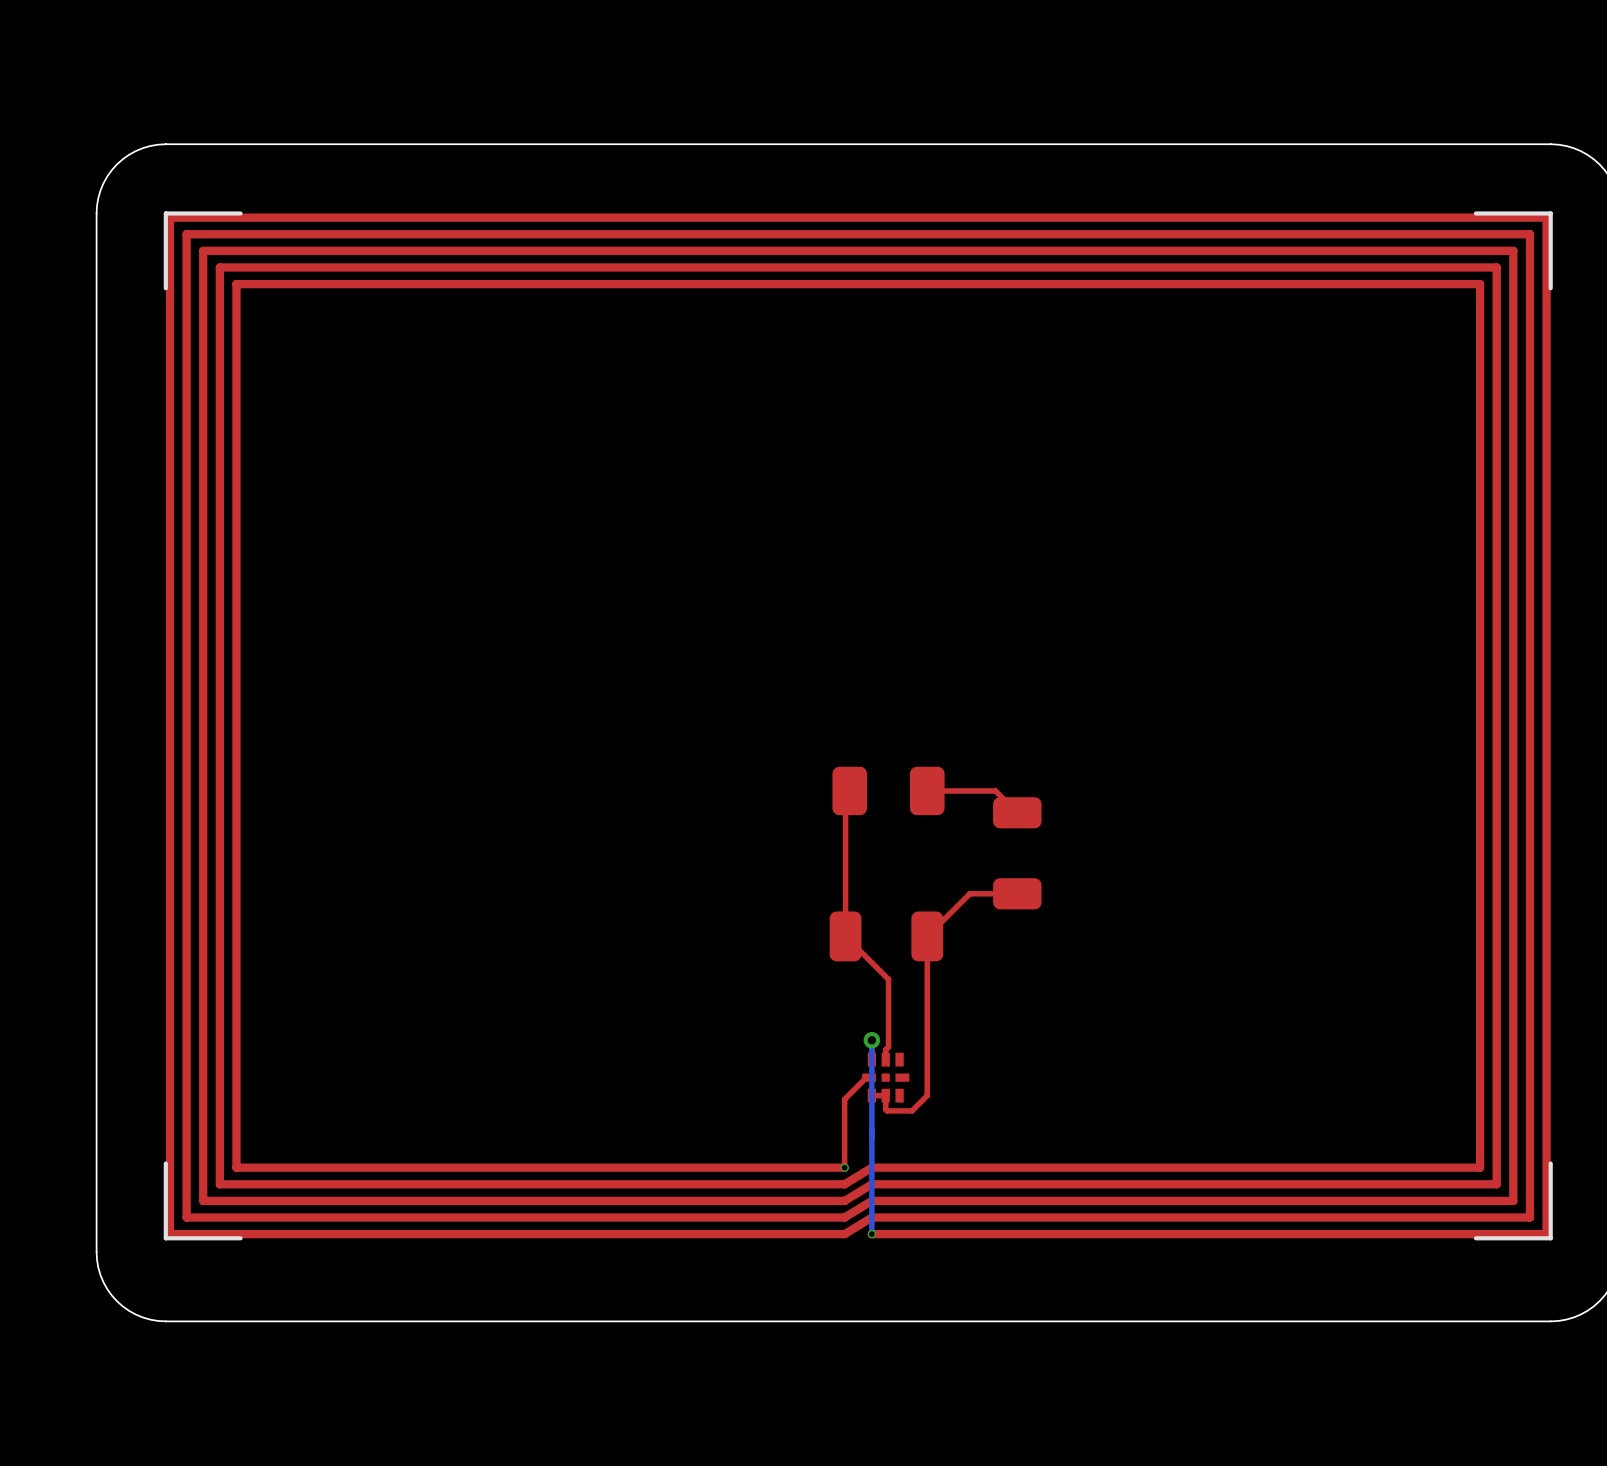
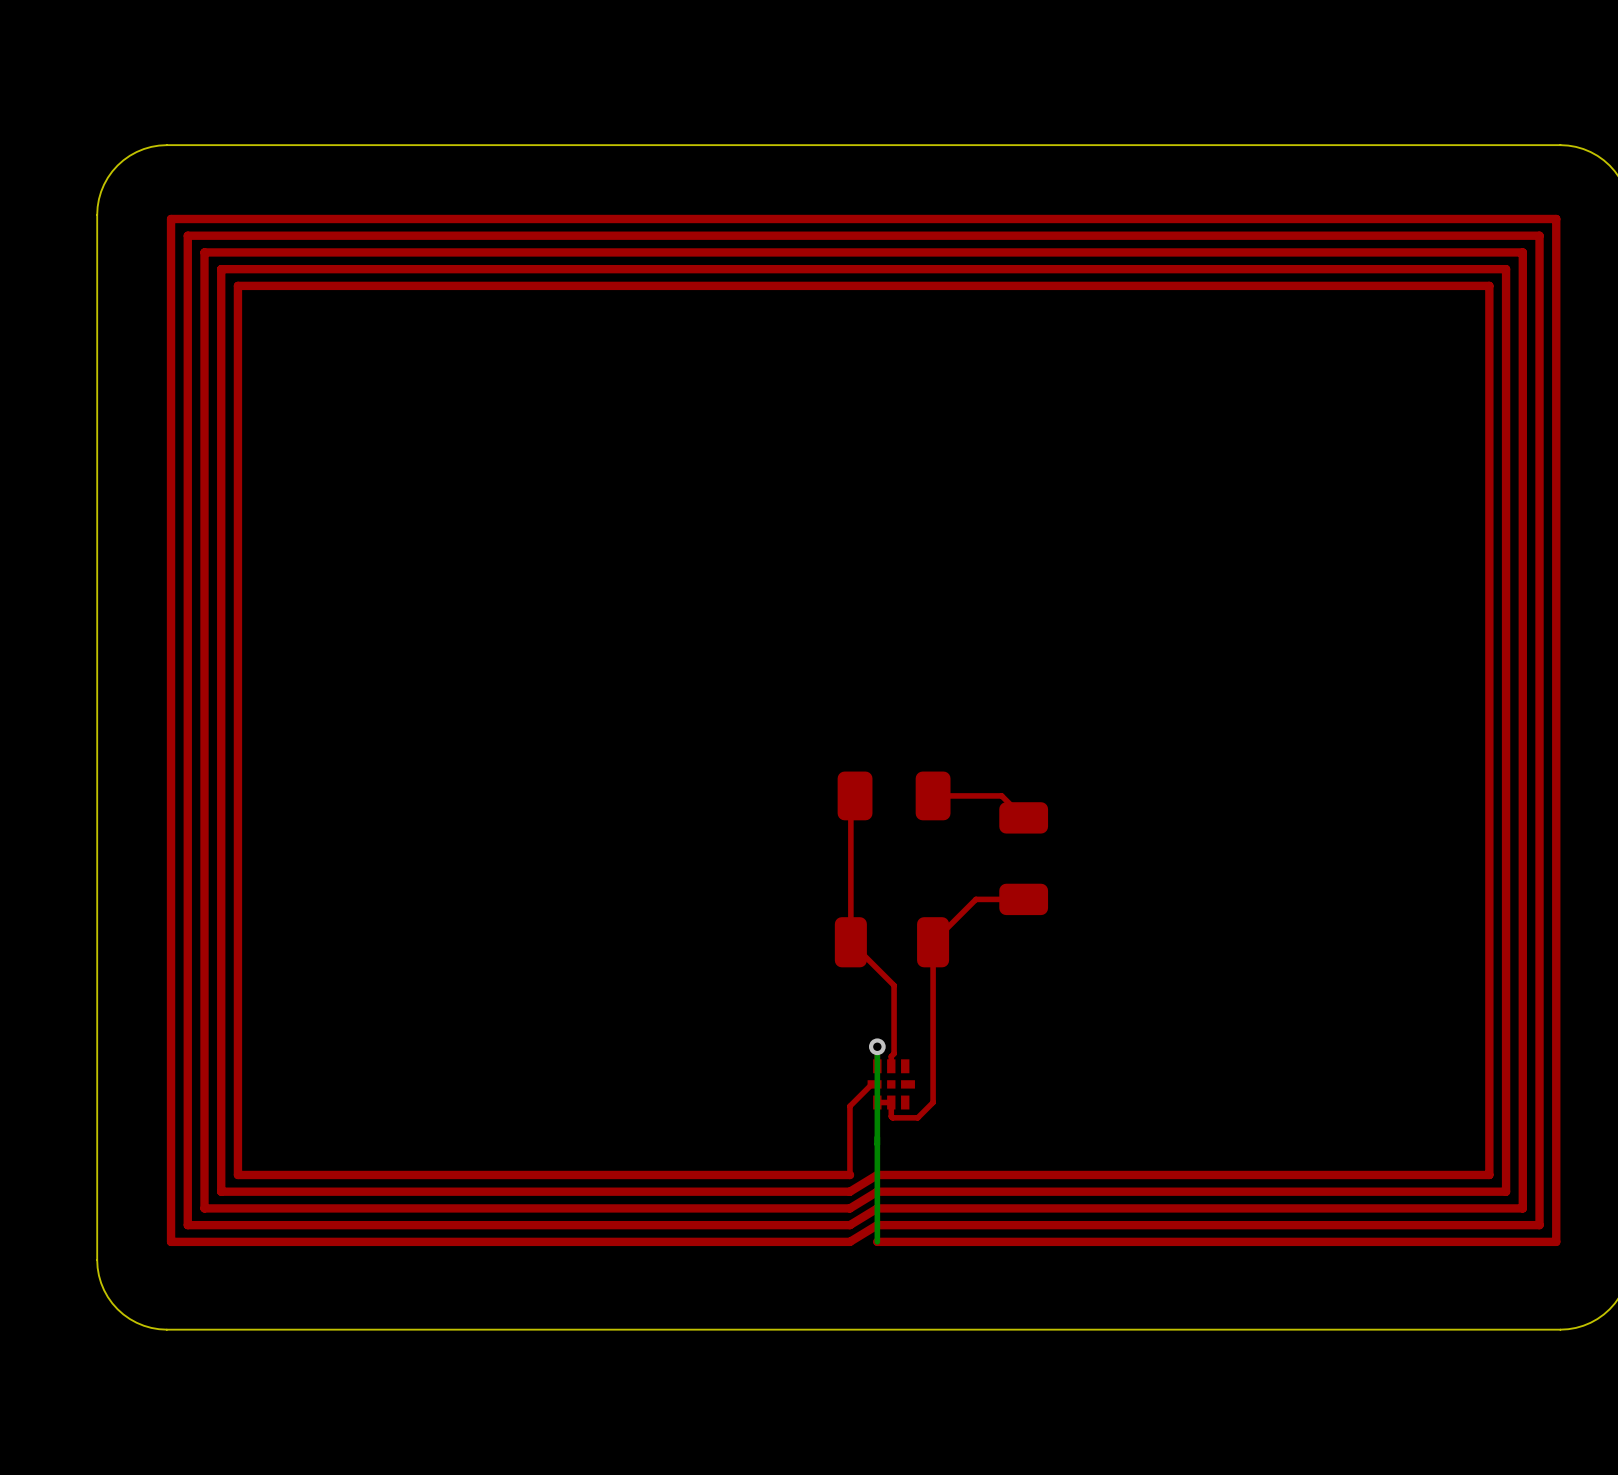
part footprint: [163, 211, 1553, 1241] -> [166, 214, 1561, 1247]

